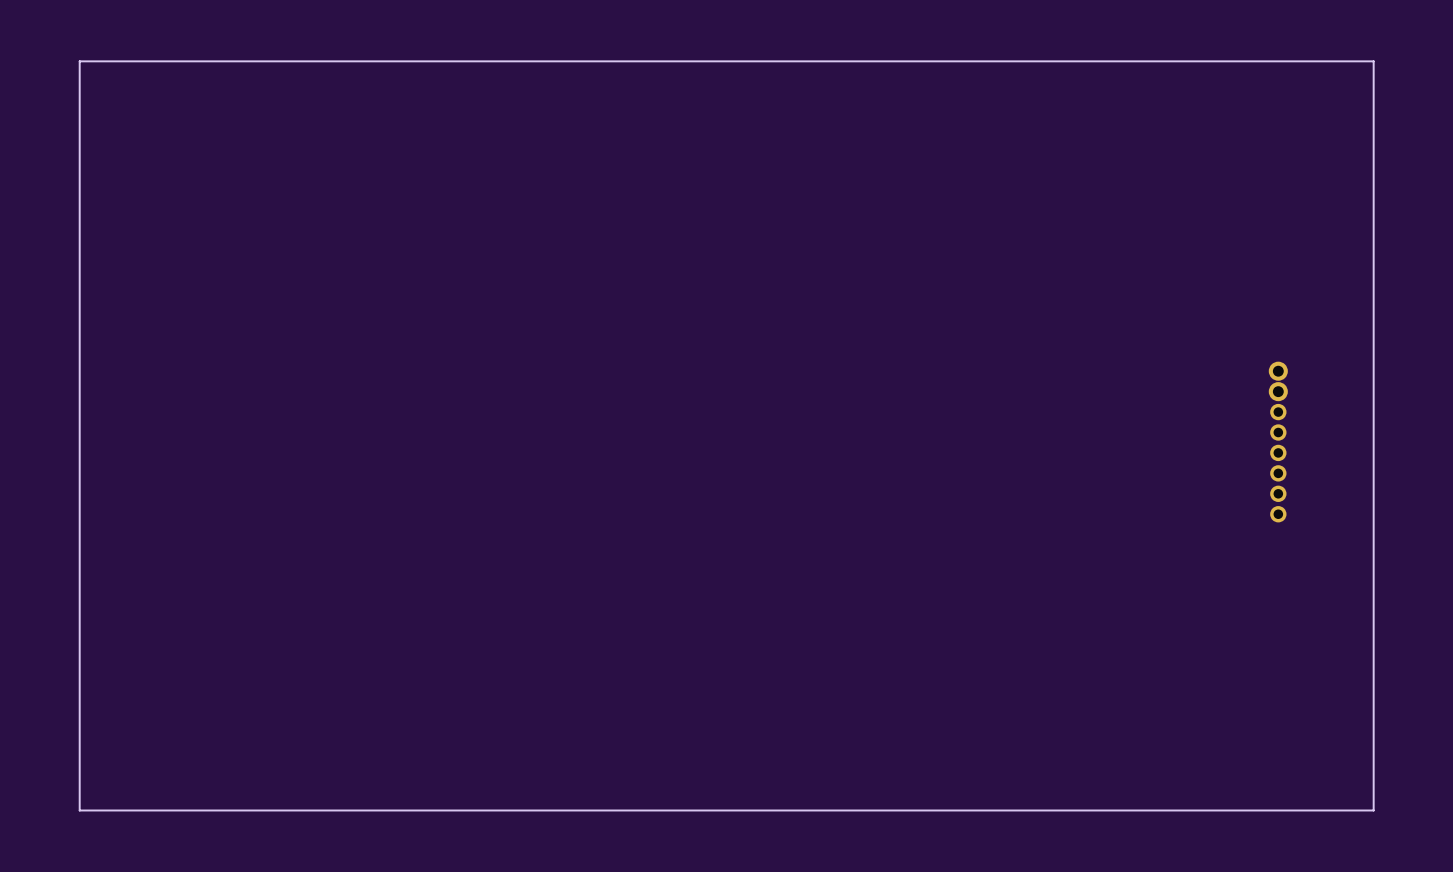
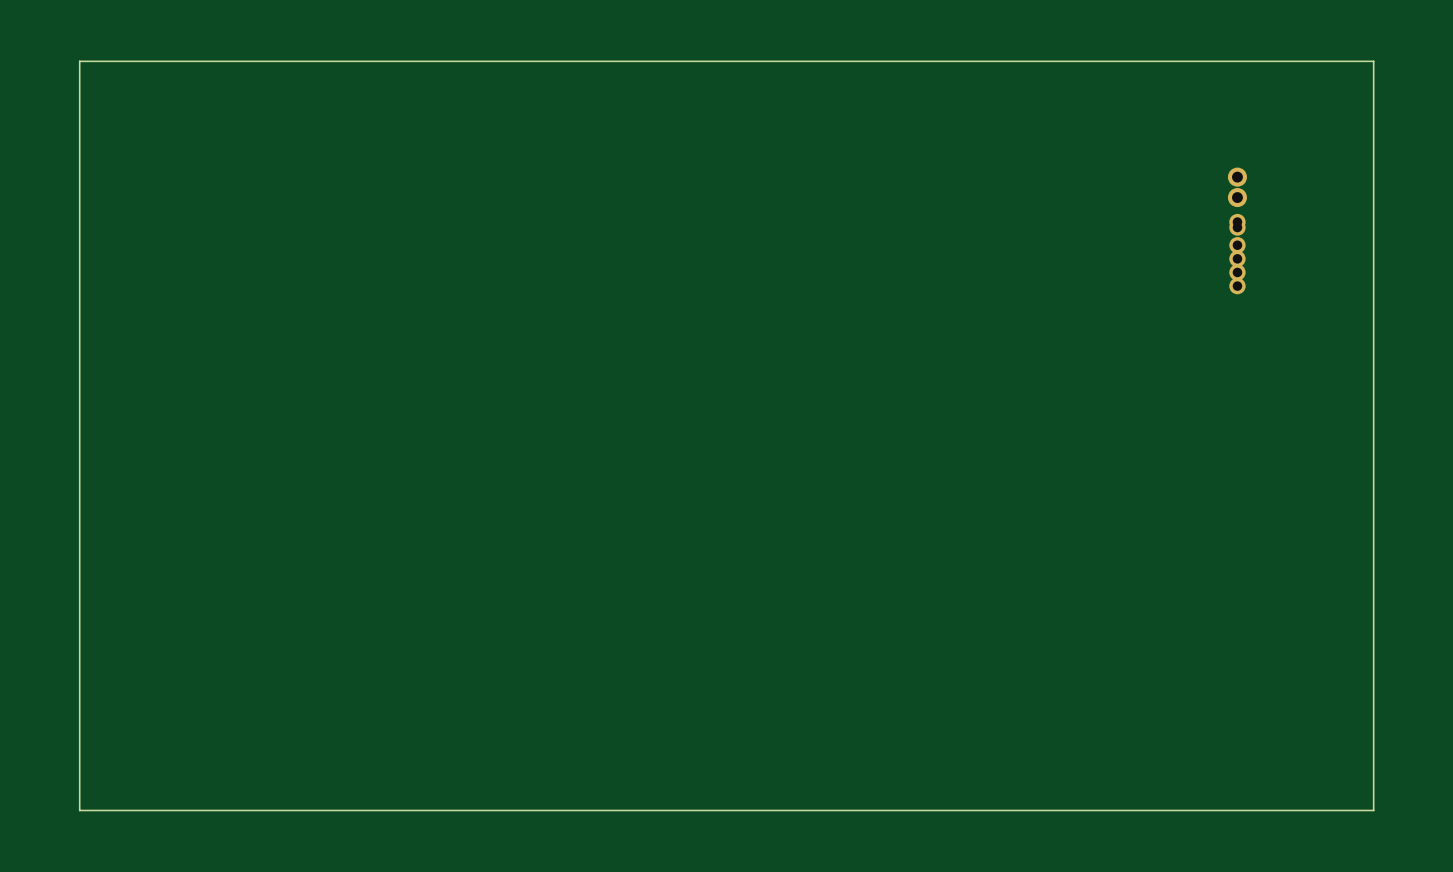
part: none -> (1237, 230)
part: (1278, 442) -> none

